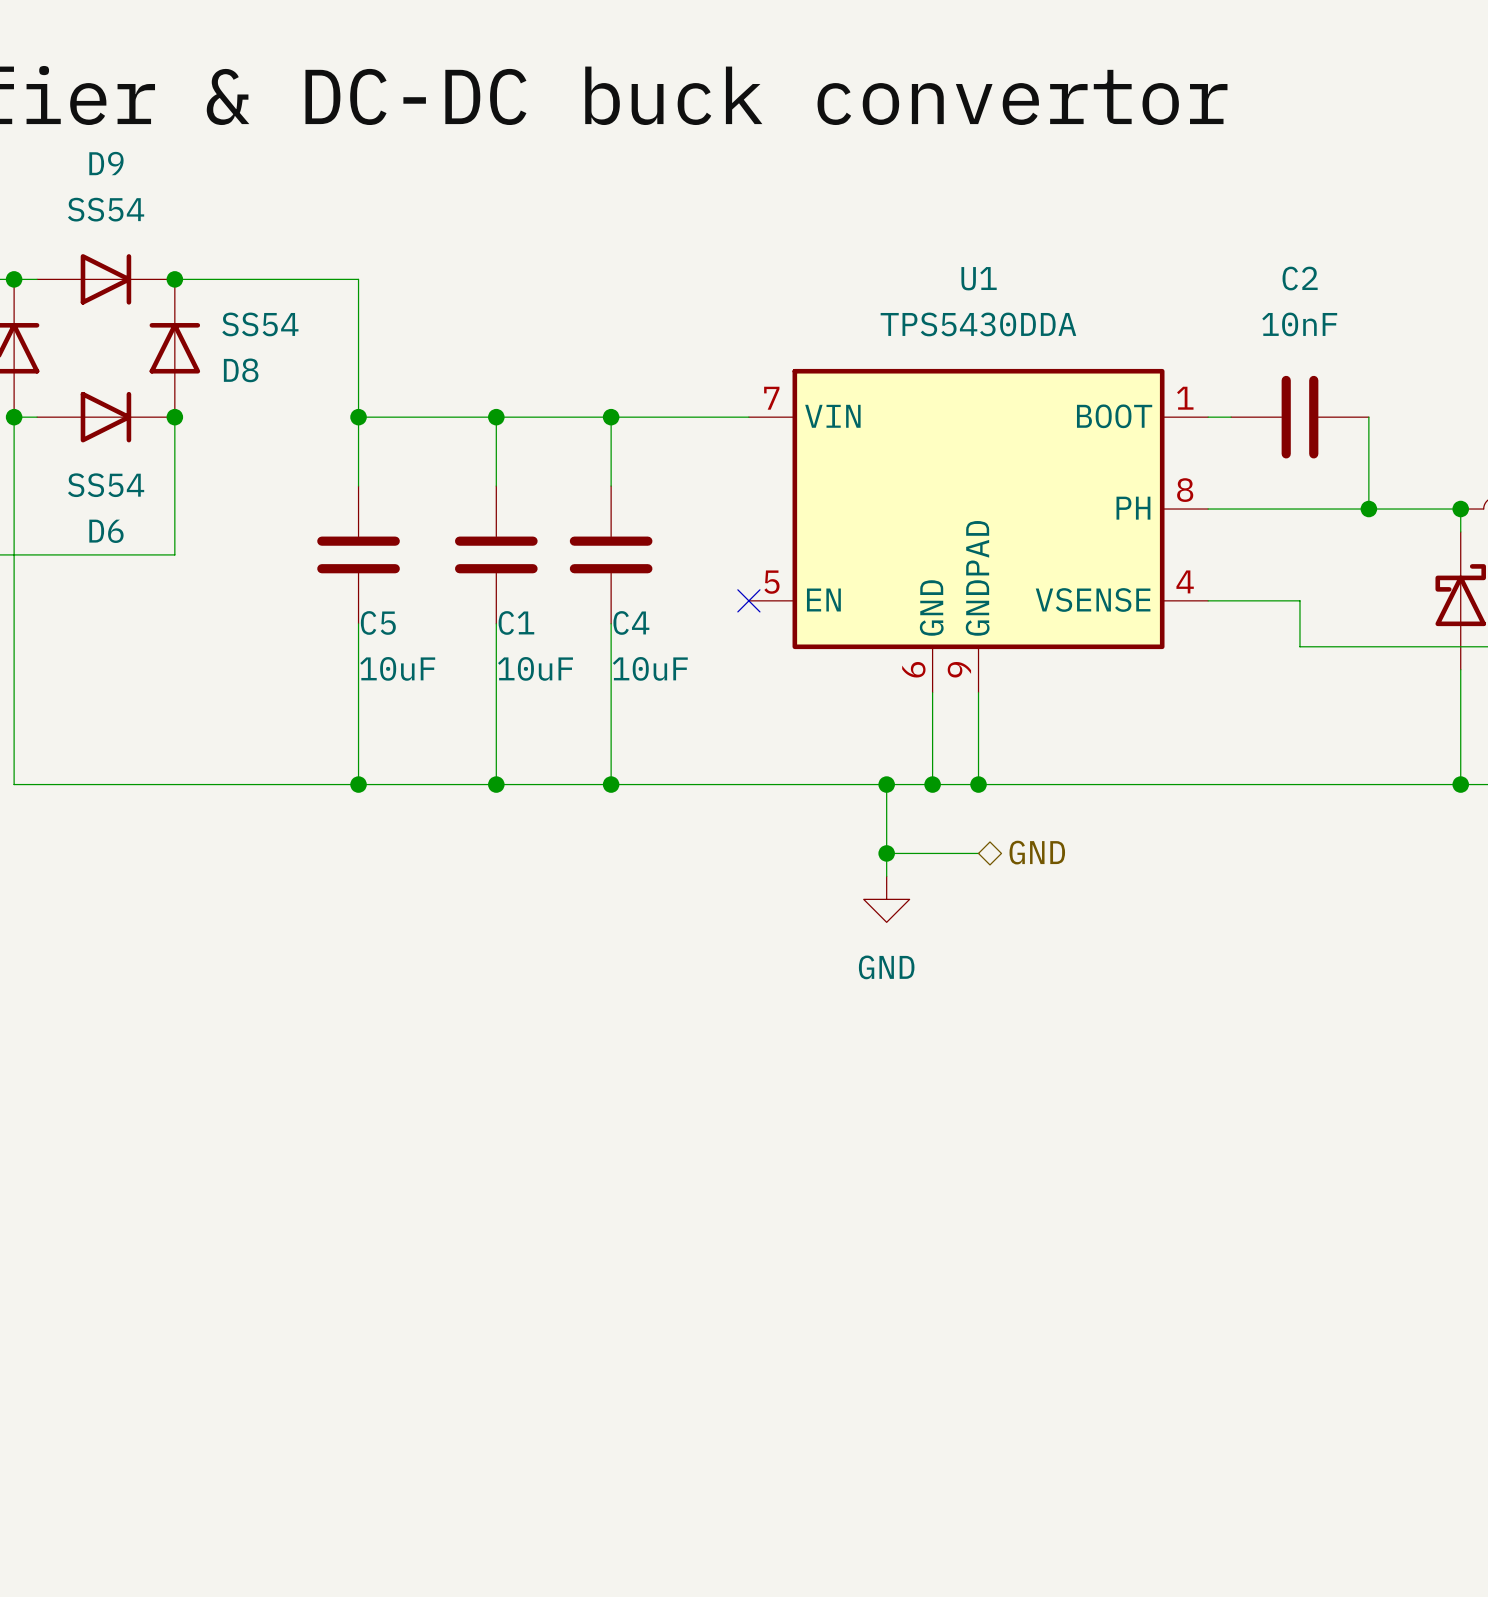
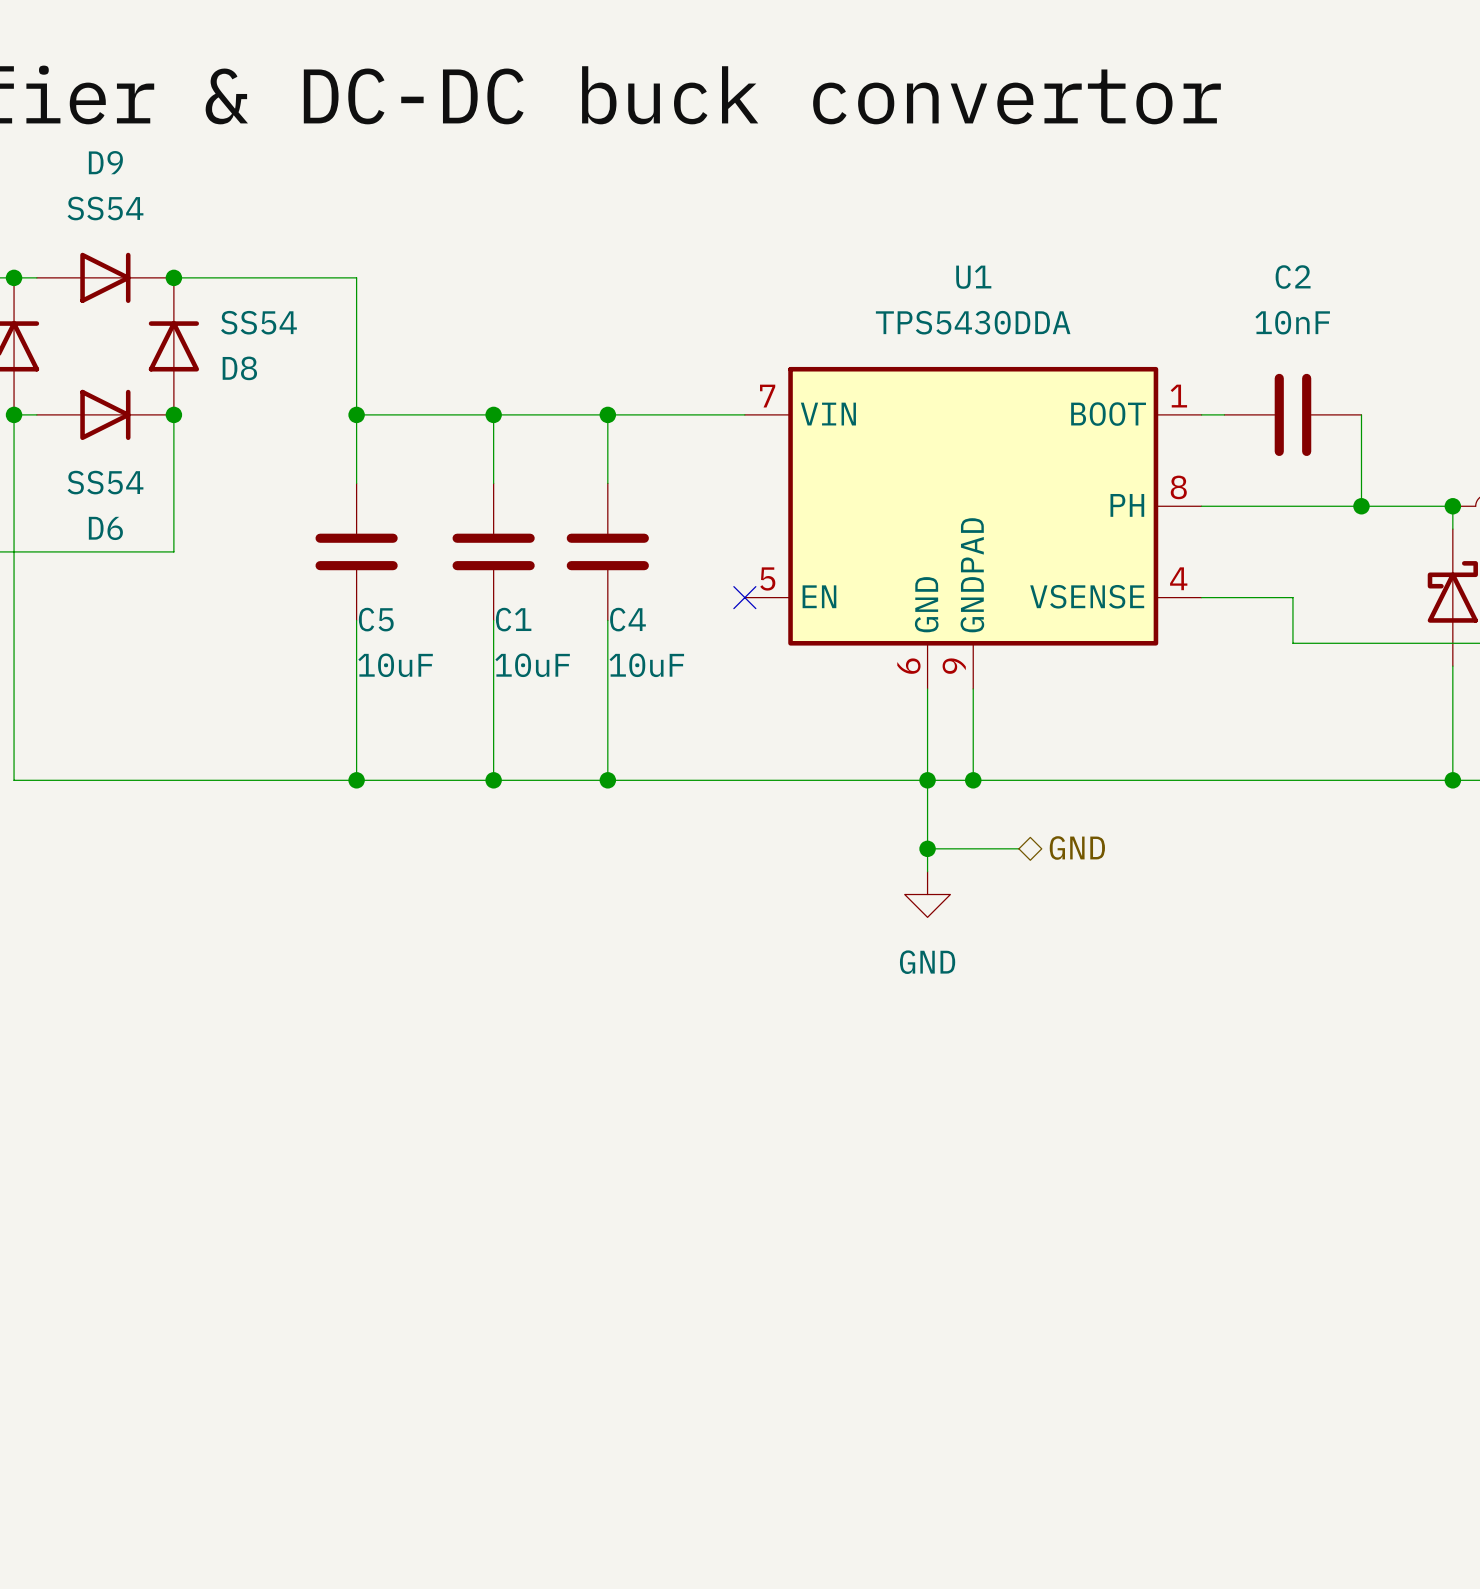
wire: (886, 784) (886, 876) -> (927, 780) (927, 871)
junction: (886, 784) -> none
hierarchical label position: GND (1037, 852) -> GND (1077, 847)
wire: (886, 853) (932, 853) -> (973, 848) (1018, 848)
junction: (886, 853) -> none
junction: none -> (927, 848)
power symbol position: GND (886, 899) -> GND (927, 894)

